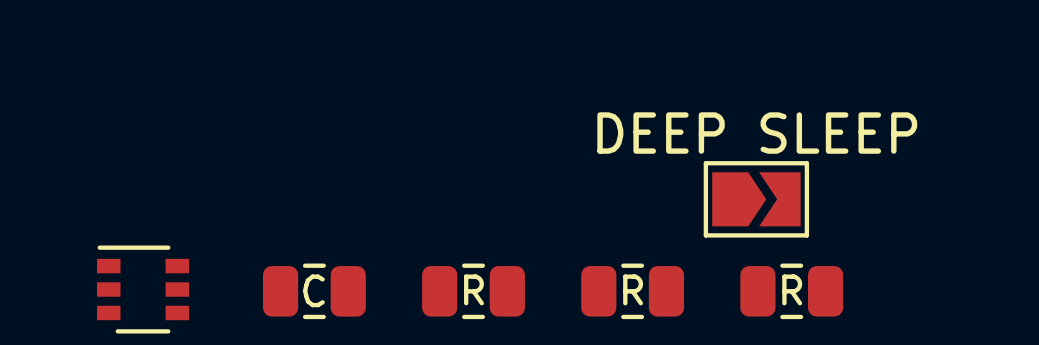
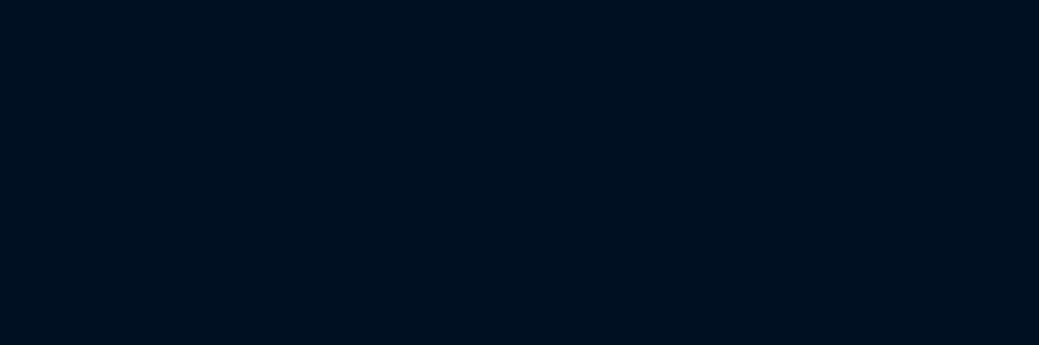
part: (756, 199) -> none
part: (143, 289) -> none
part: (314, 291) -> none
part: (473, 291) -> none
part: (632, 291) -> none
part: (791, 291) -> none

